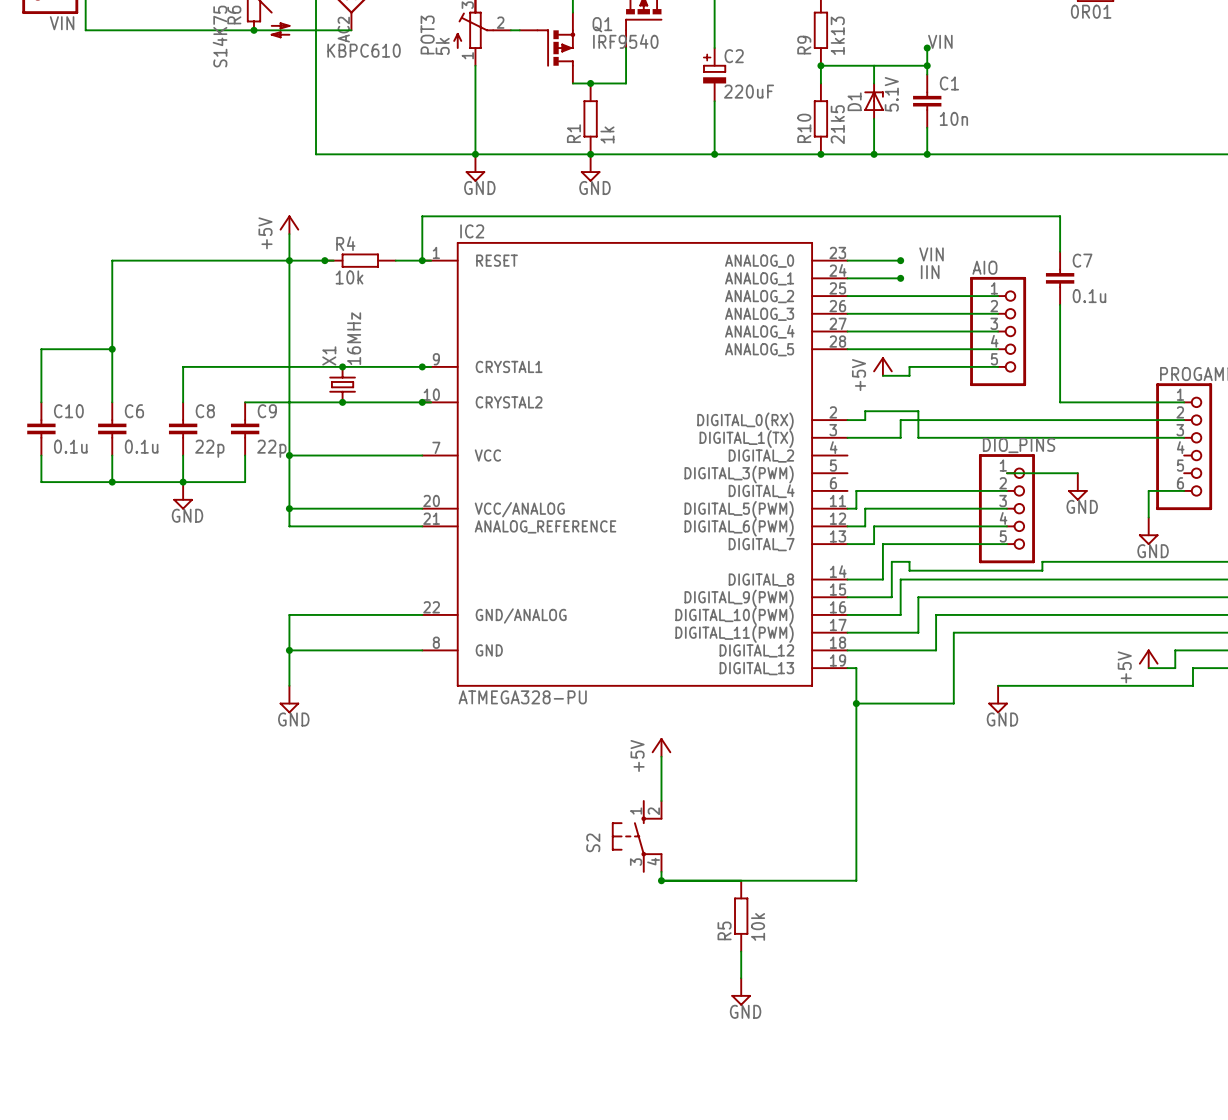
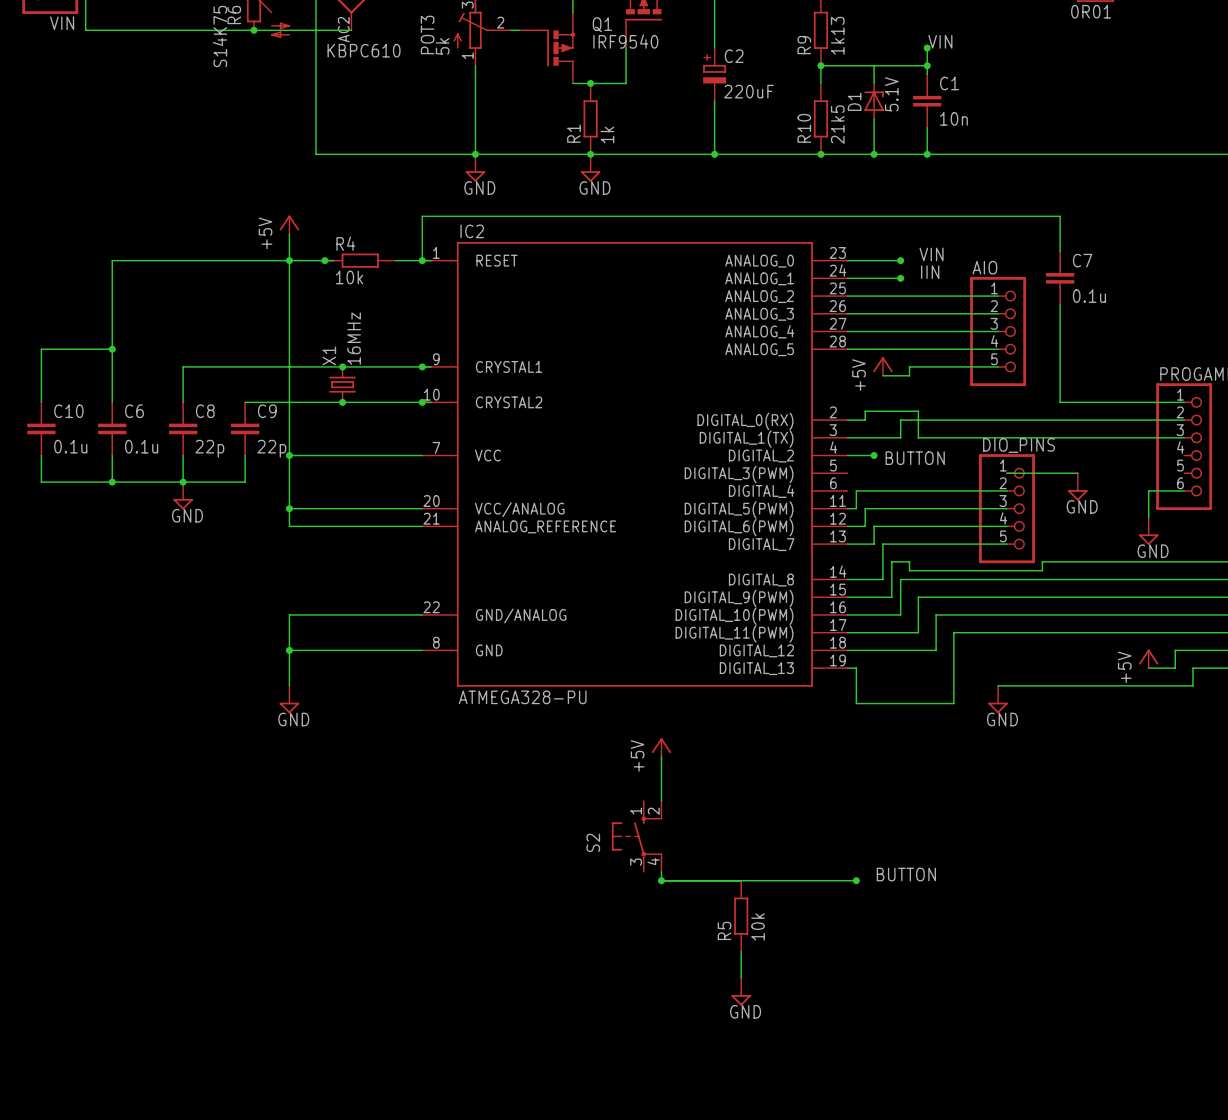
wire: none -> (847, 455) (874, 455)
junction: none -> (874, 455)
label: none -> BUTTON (915, 458)
wire: (856, 703) (856, 880) -> none
junction: (856, 703) -> none
label: none -> BUTTON (906, 874)
junction: none -> (856, 880)

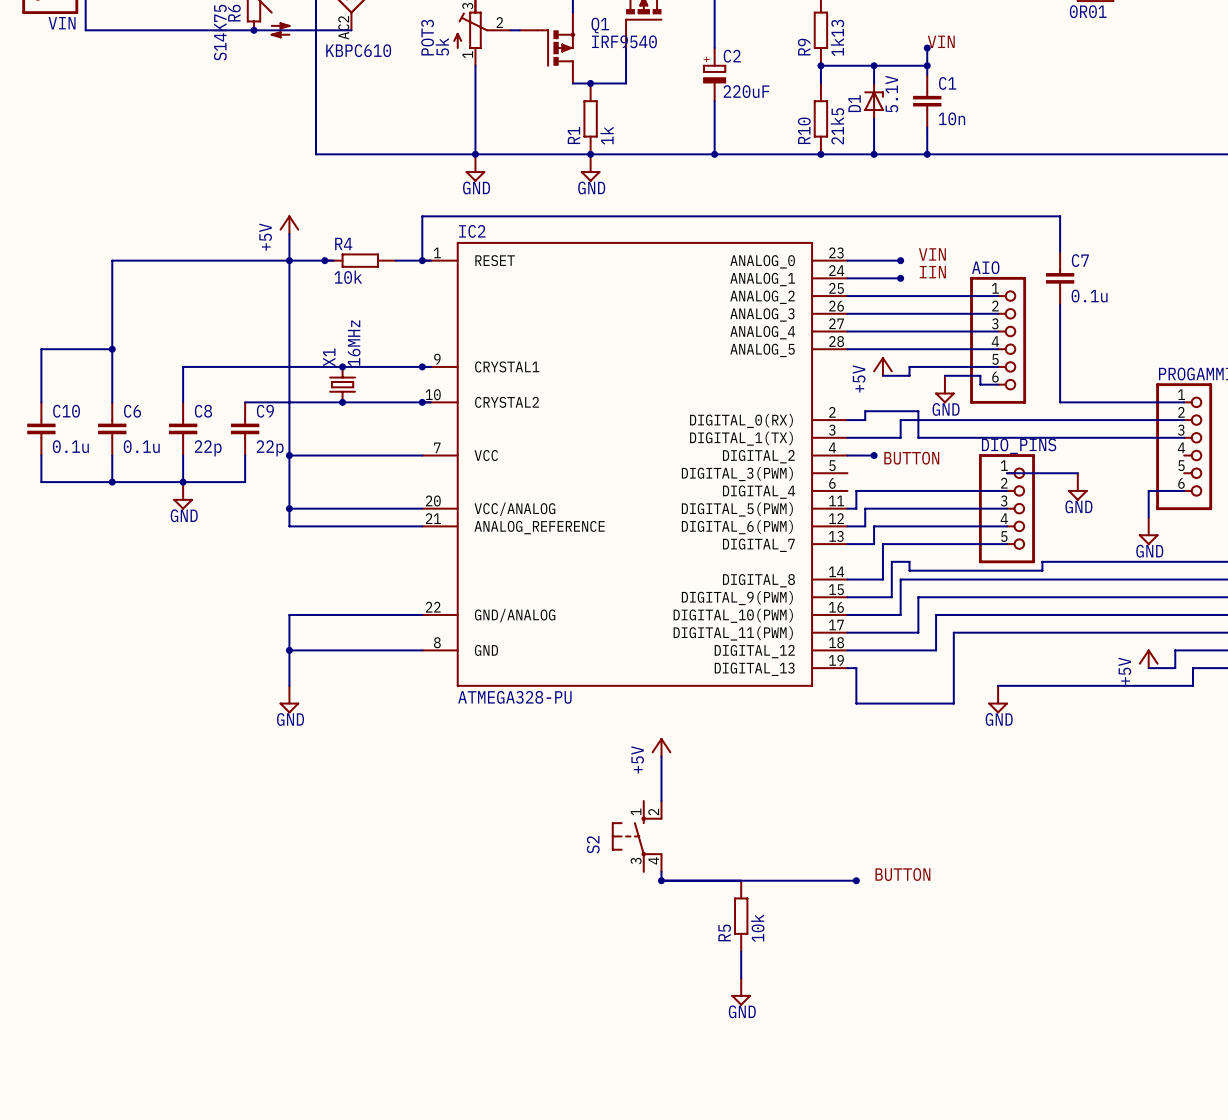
junction: none -> (874, 65)
AIO: (998, 331) -> none
AIO: none -> (998, 340)
wire: none -> (944, 375) (980, 375) (980, 384) (998, 384)
power symbol: none -> GND (944, 389)

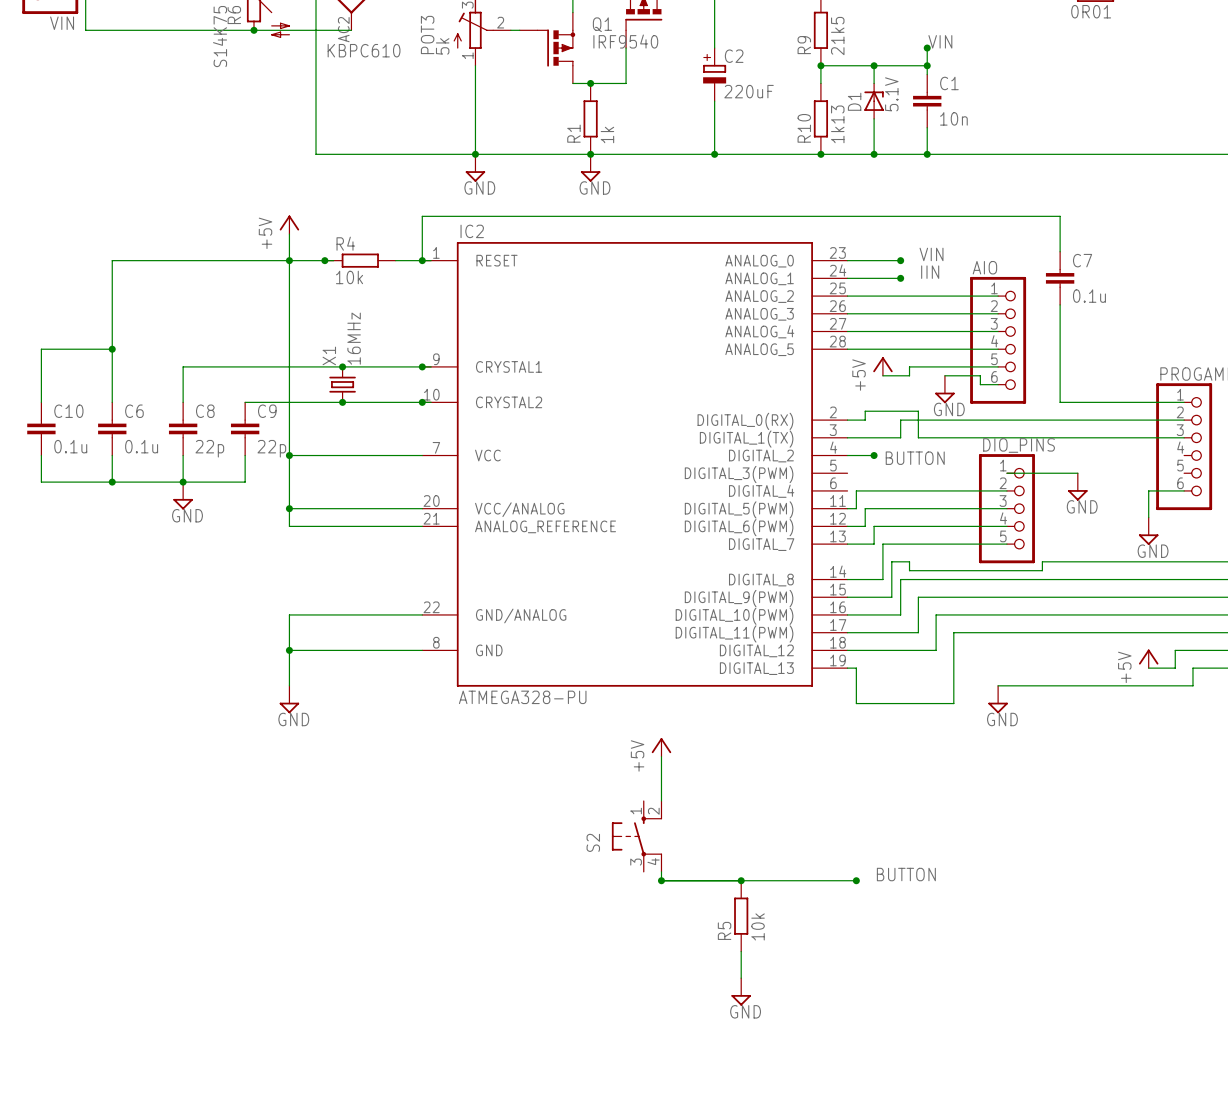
R9 value: 1k13 (837, 37) -> 21k5 (837, 36)
R10 value: 21k5 (837, 126) -> 1k13 (837, 124)
junction: none -> (741, 880)

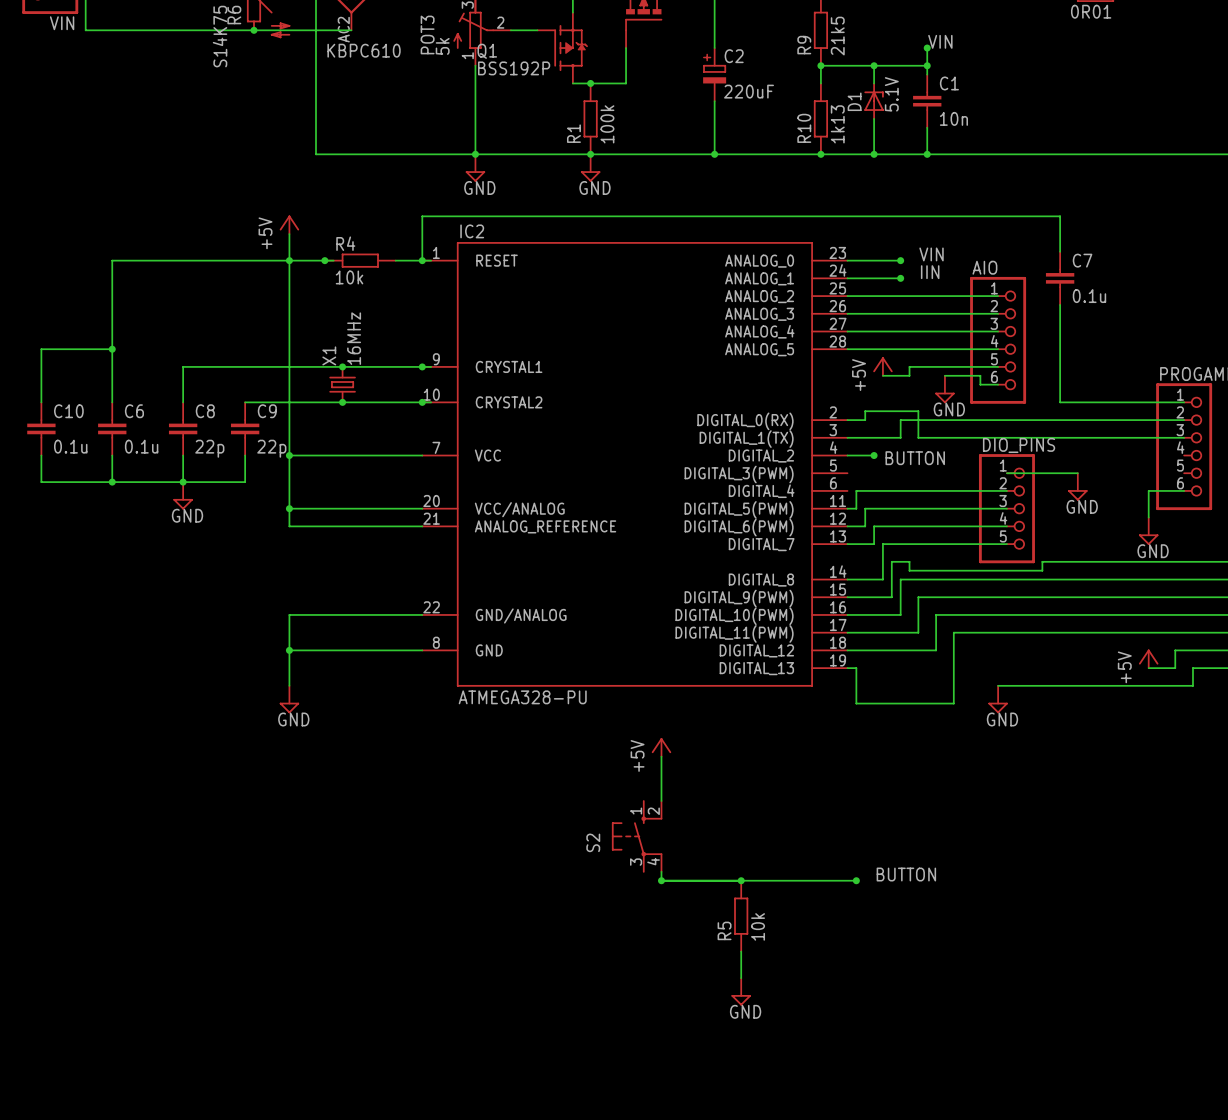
Q1 symbol: [519, 12, 576, 84] -> [537, 12, 588, 84]
Q1 name position: Q1 (602, 24) -> Q1 (487, 51)
Q1 value: IRF9540 (625, 41) -> BSS192P (514, 68)
R1 value: 1k (607, 134) -> 100k (607, 124)

